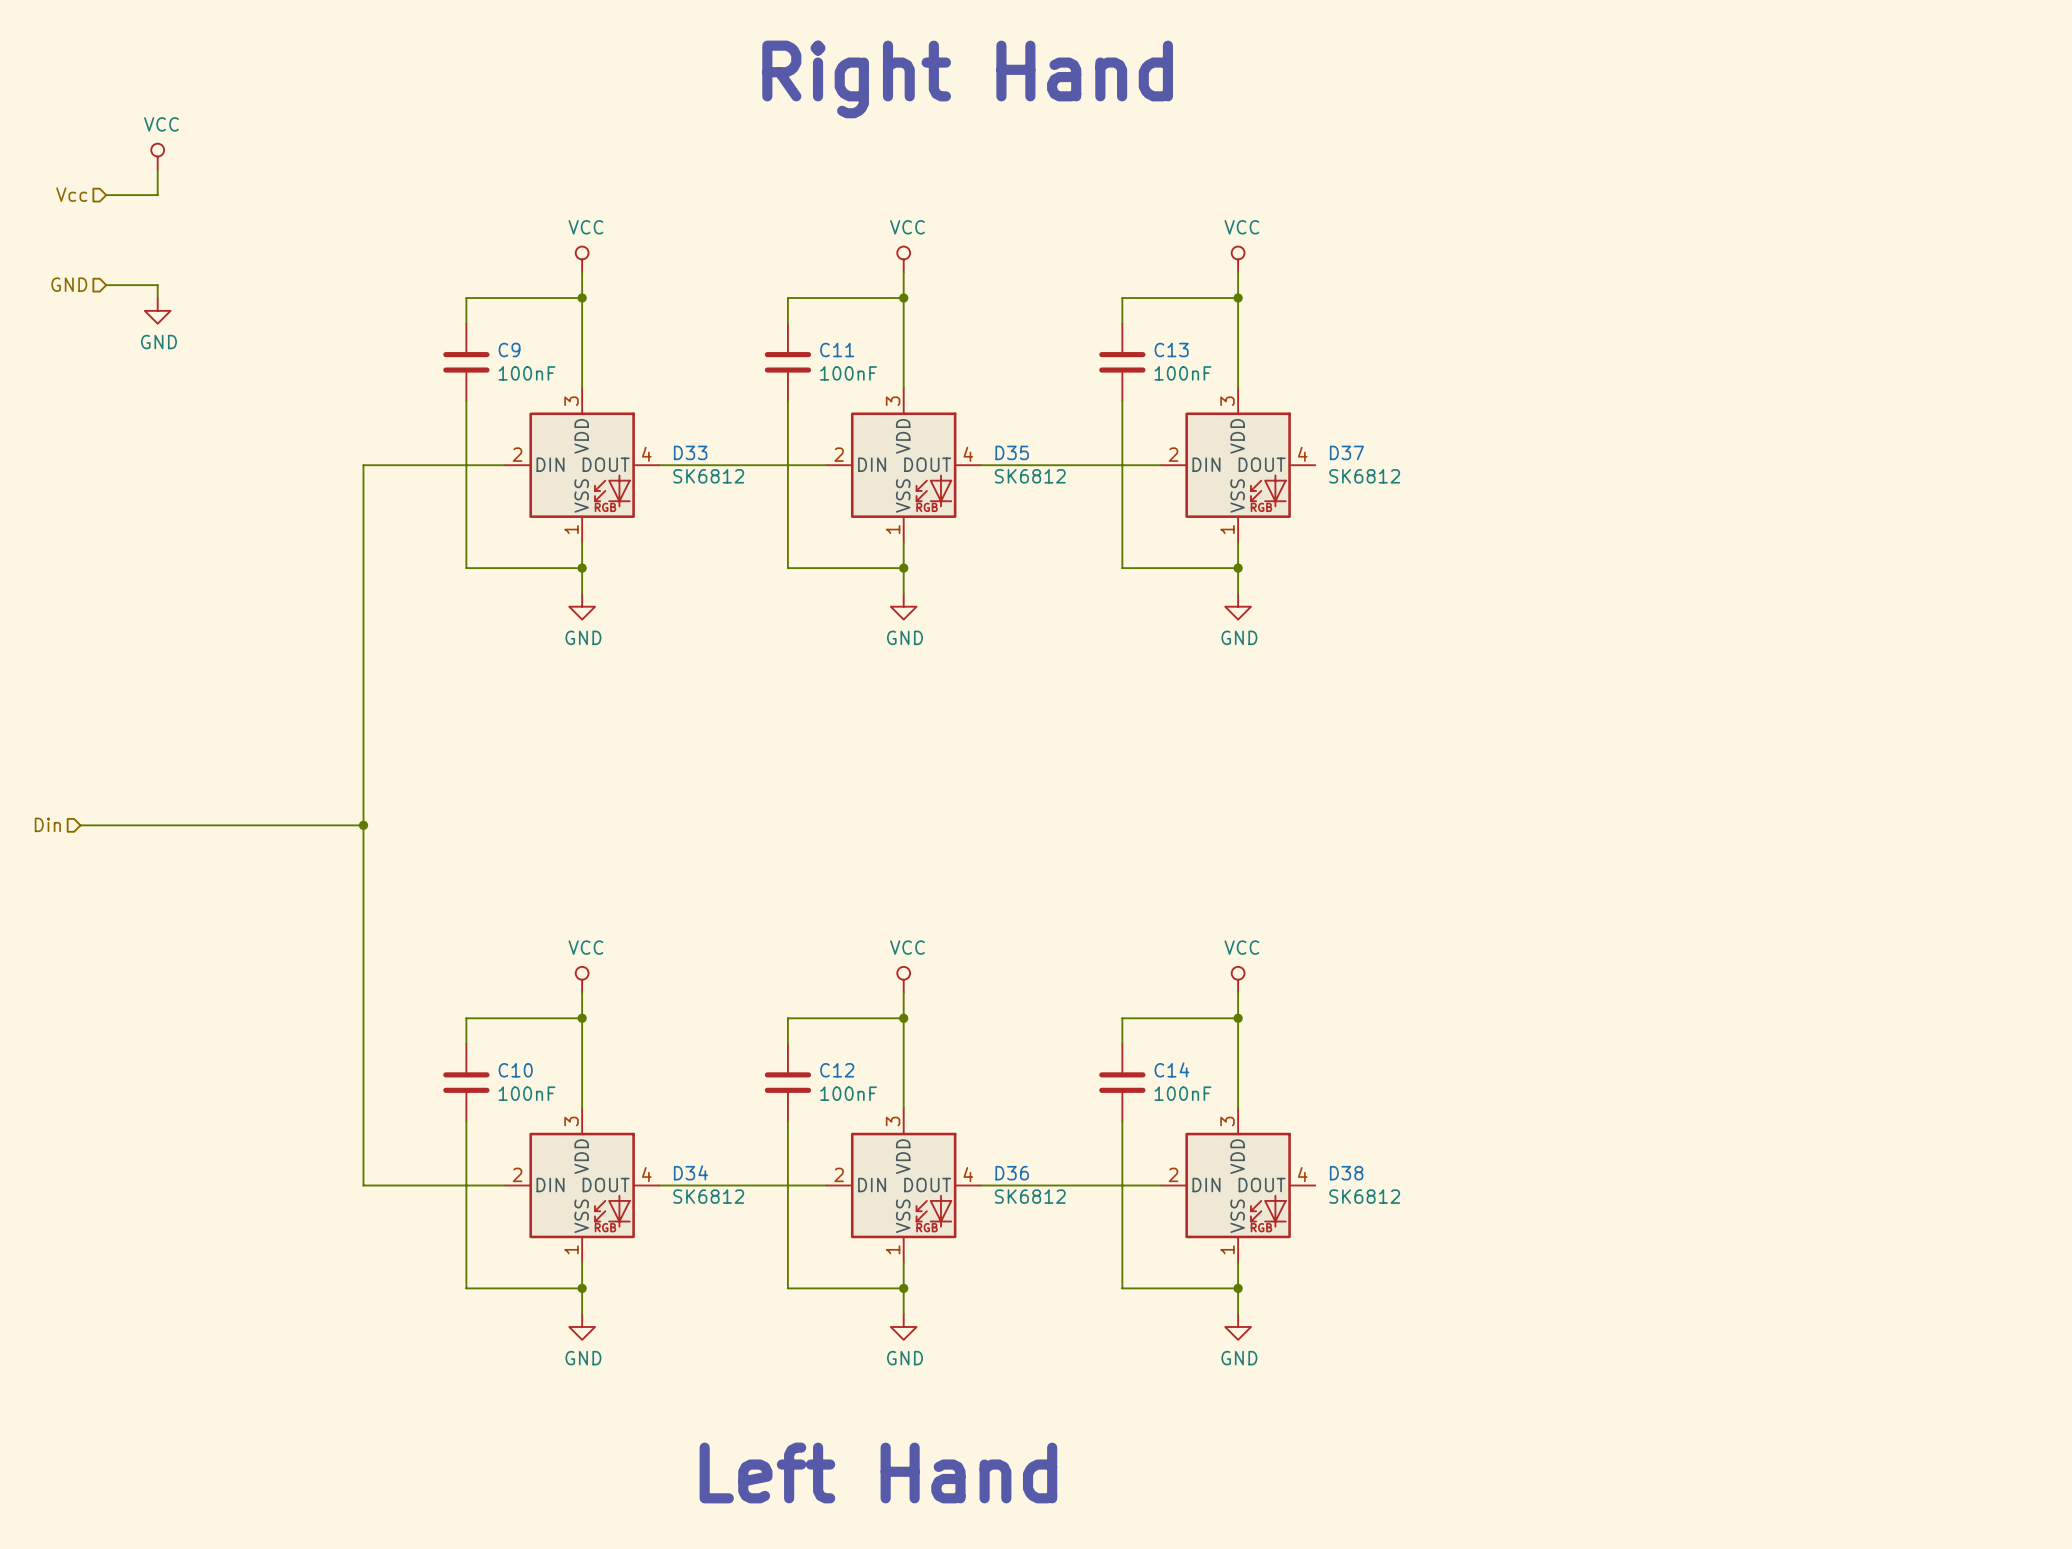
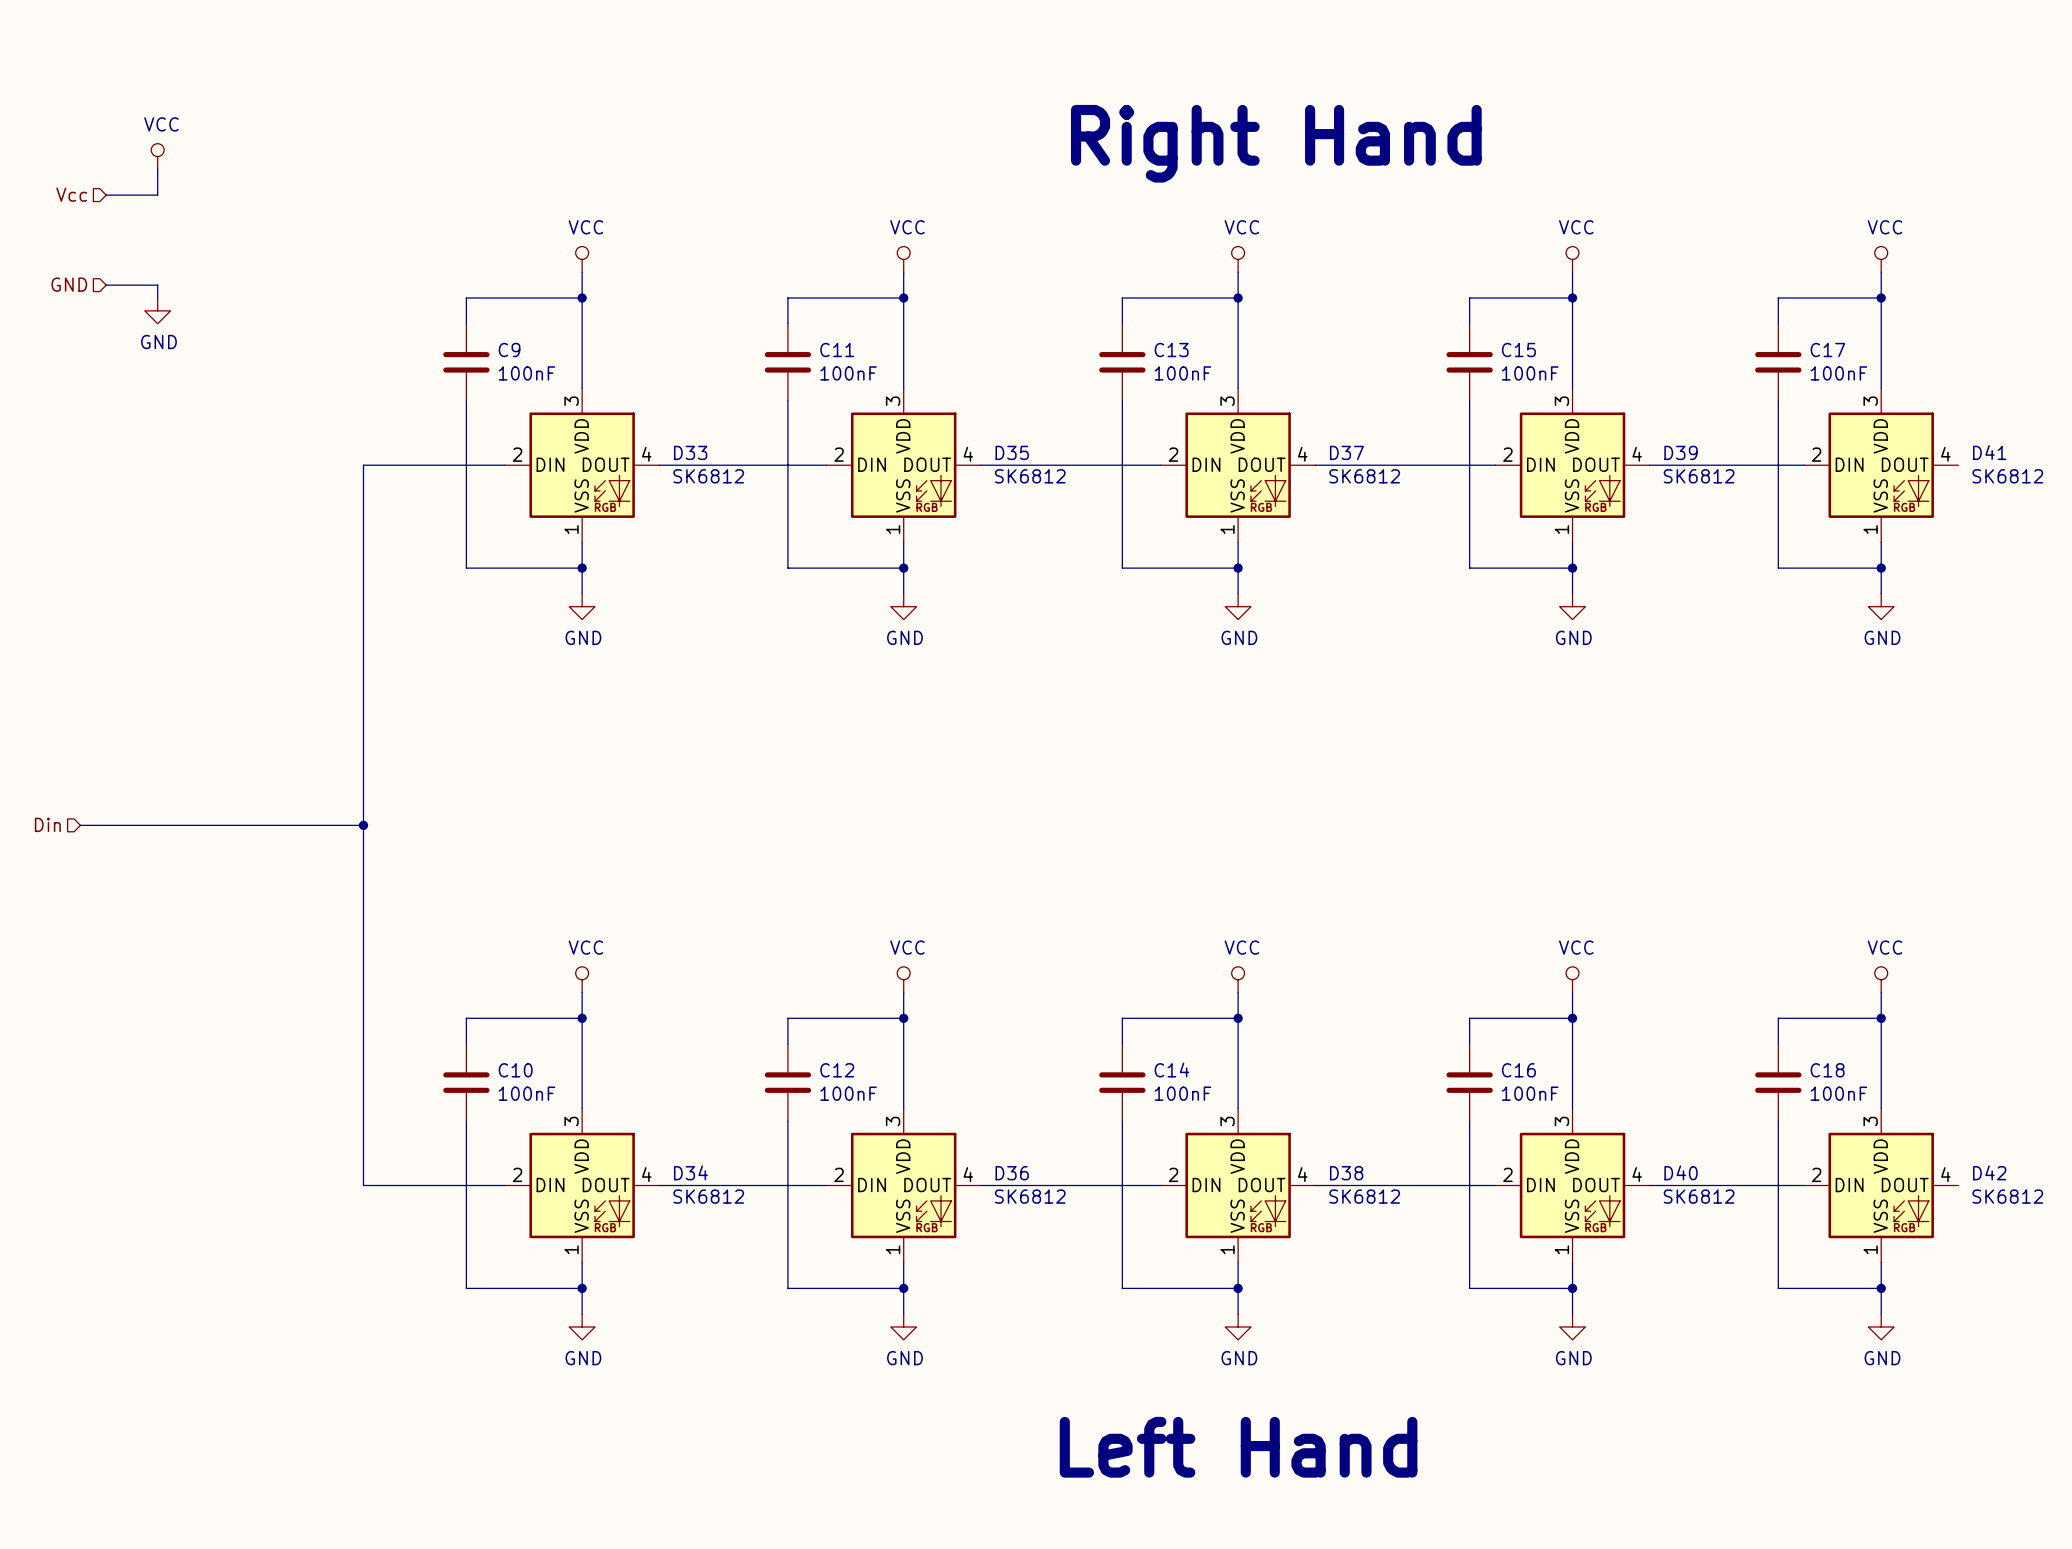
text: Right Hand (967, 79) -> none
text: none -> Right Hand (1276, 143)
power symbol: none -> VCC (1572, 259)
power symbol: none -> VCC (1881, 259)
wire: none -> (1572, 272) (1572, 388)
wire: none -> (1881, 272) (1881, 388)
wire: none -> (1572, 298) (1469, 298) (1469, 323)
junction: none -> (1572, 298)
wire: none -> (1881, 298) (1778, 298) (1778, 323)
junction: none -> (1881, 298)
C15: none -> 100nF (1469, 362)
C17: none -> 100nF (1778, 362)
wire: none -> (1469, 400) (1469, 568) (1572, 568)
wire: none -> (1778, 400) (1778, 568) (1881, 568)
wire: none -> (1315, 465) (1495, 465)
D39: none -> SK6812 (1572, 465)
wire: none -> (1649, 465) (1804, 465)
D41: none -> SK6812 (1881, 465)
wire: none -> (1572, 542) (1572, 593)
wire: none -> (1881, 542) (1881, 593)
junction: none -> (1572, 568)
junction: none -> (1881, 568)
power symbol: none -> GND (1572, 606)
power symbol: none -> GND (1881, 606)
power symbol: none -> VCC (1572, 979)
power symbol: none -> VCC (1881, 979)
wire: none -> (1572, 992) (1572, 1108)
wire: none -> (1881, 992) (1881, 1108)
wire: none -> (1572, 1018) (1469, 1018) (1469, 1044)
junction: none -> (1572, 1018)
wire: none -> (1881, 1018) (1778, 1018) (1778, 1044)
junction: none -> (1881, 1018)
C16: none -> 100nF (1469, 1082)
C18: none -> 100nF (1778, 1082)
wire: none -> (1469, 1121) (1469, 1288) (1572, 1288)
wire: none -> (1778, 1121) (1778, 1288) (1881, 1288)
wire: none -> (1315, 1185) (1495, 1185)
D40: none -> SK6812 (1572, 1185)
wire: none -> (1649, 1185) (1804, 1185)
D42: none -> SK6812 (1881, 1185)
wire: none -> (1572, 1262) (1572, 1314)
wire: none -> (1881, 1262) (1881, 1314)
junction: none -> (1572, 1288)
junction: none -> (1881, 1288)
power symbol: none -> GND (1572, 1326)
power symbol: none -> GND (1881, 1326)
text: none -> Left Hand (1238, 1447)
text: Left Hand (878, 1472) -> none

